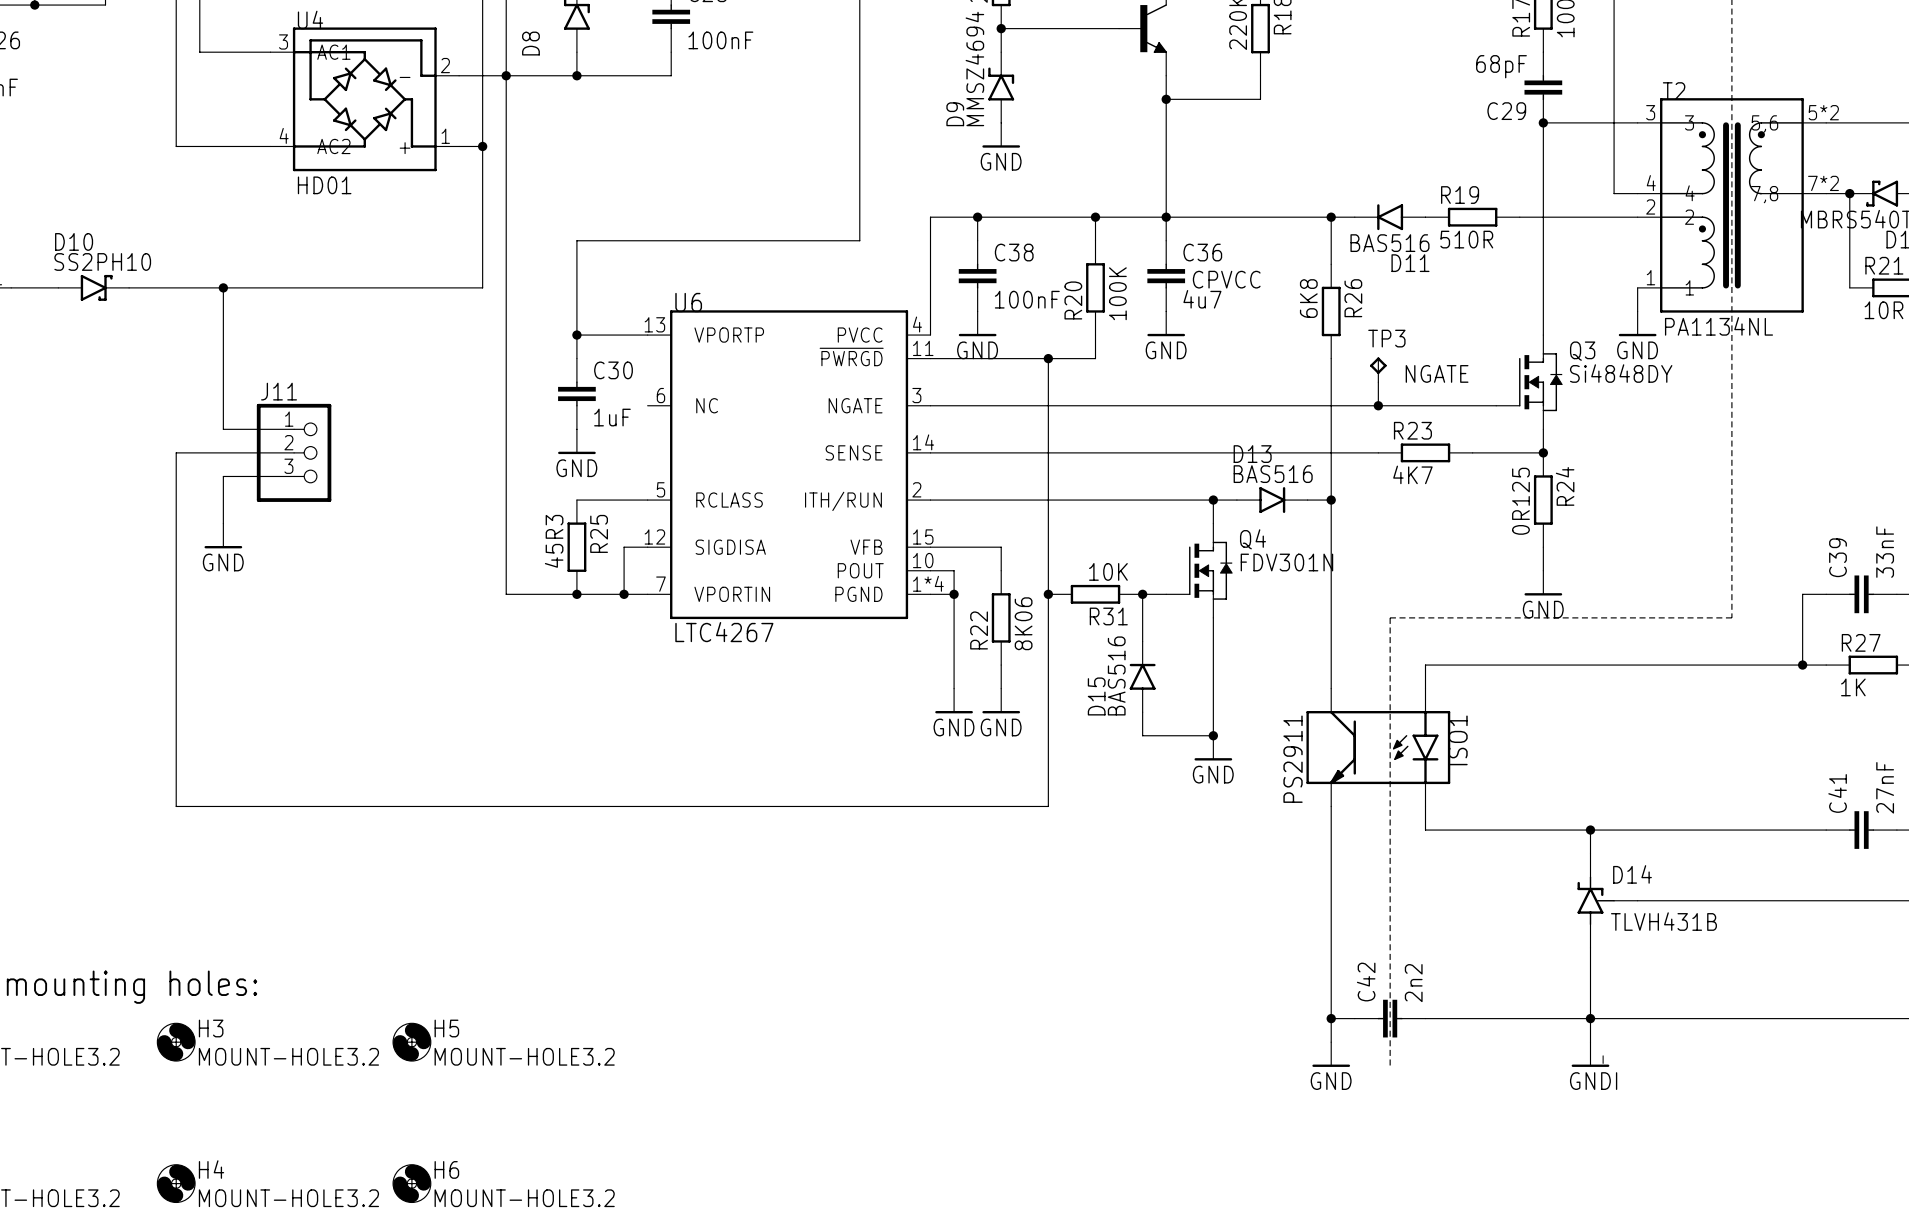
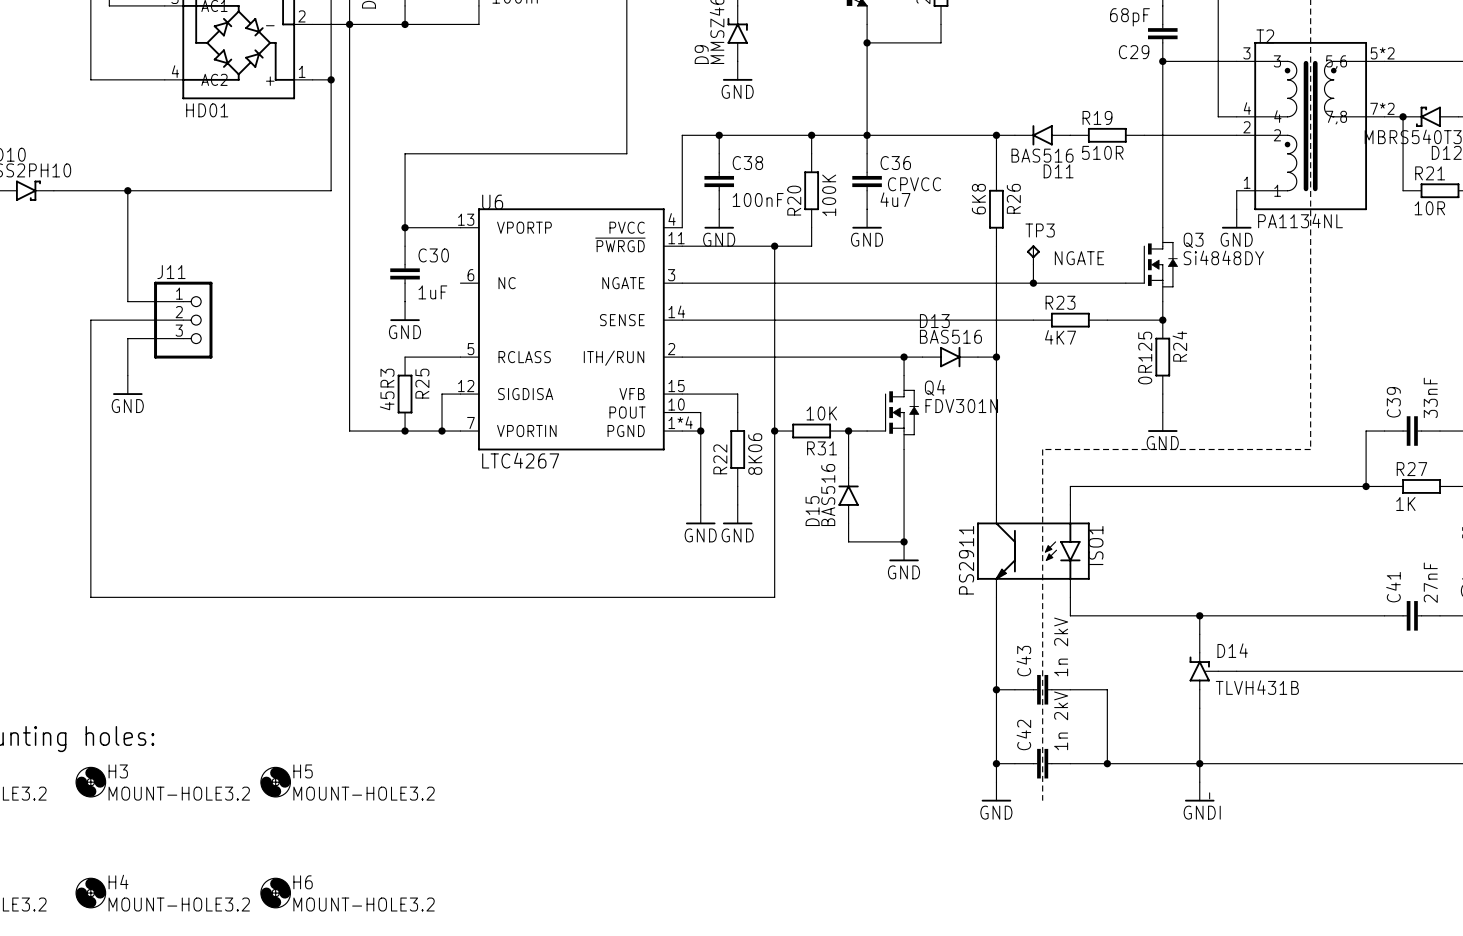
wire: none -> (996, 689) (1014, 689)
junction: none -> (996, 689)
C43: none -> 1n 2kV (1042, 689)
wire: none -> (1070, 689) (1107, 689) (1107, 763)
C42 value: 2n2 (1413, 983) -> 1n 2kV (1061, 720)
junction: none -> (1107, 763)

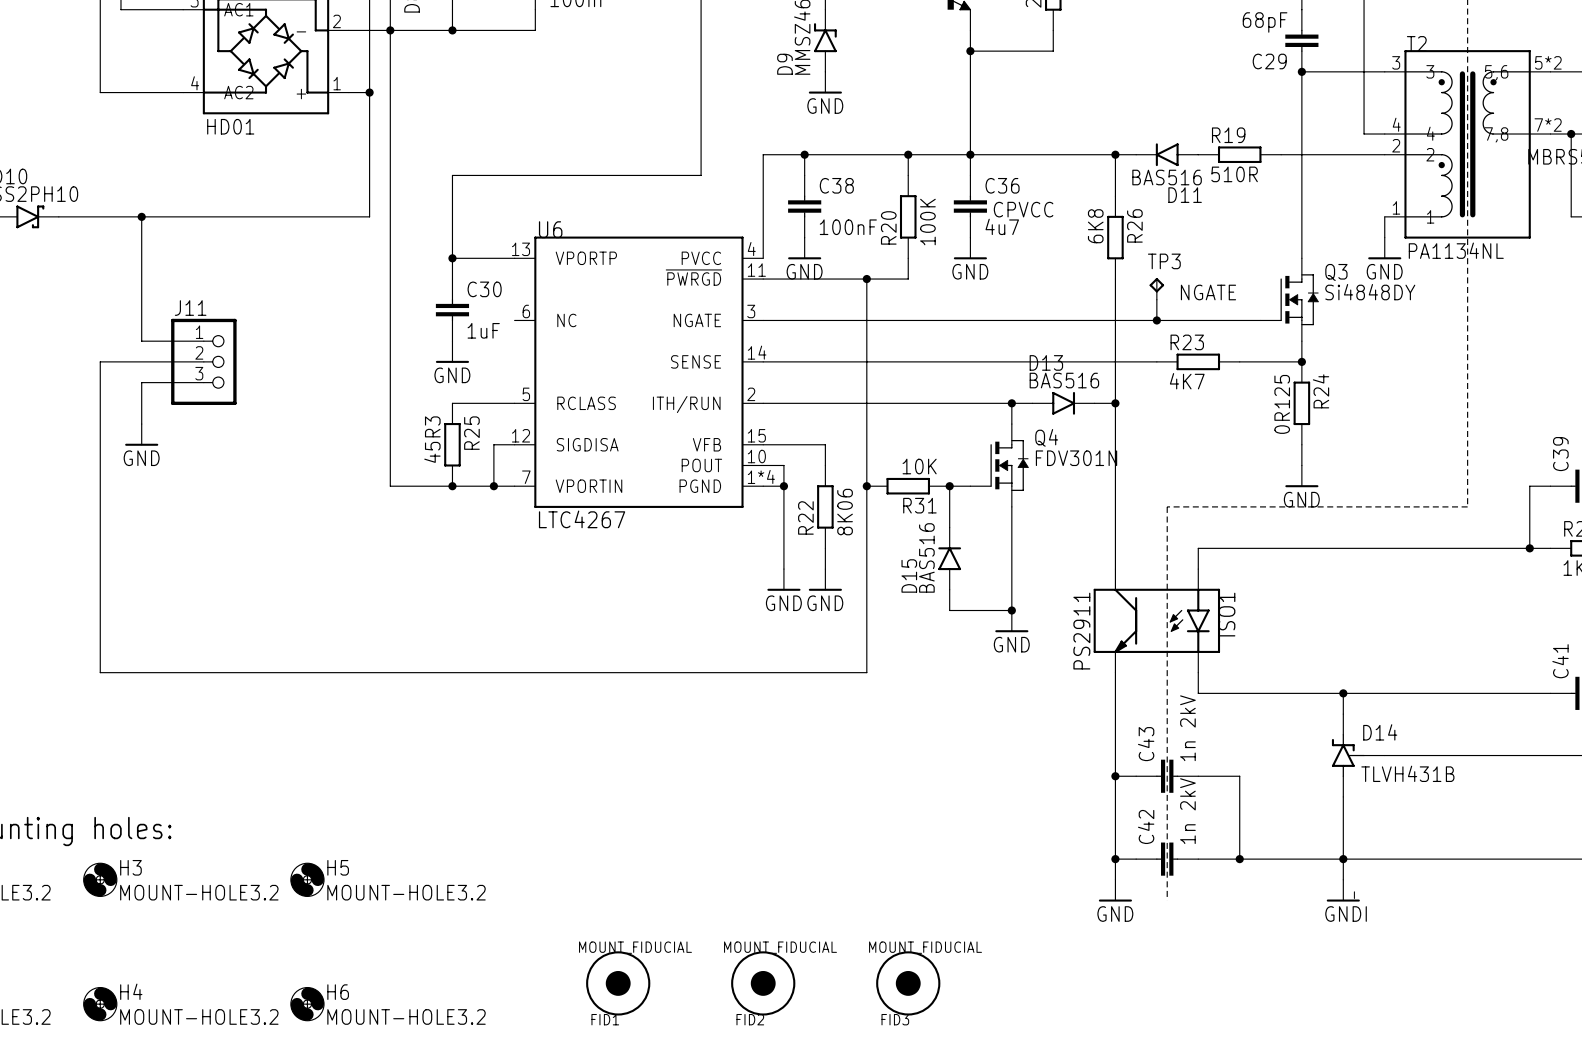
FID1: none -> MOUNT_FIDUCIAL (618, 983)
FID2: none -> MOUNT_FIDUCIAL (763, 983)
FID3: none -> MOUNT_FIDUCIAL (908, 983)

